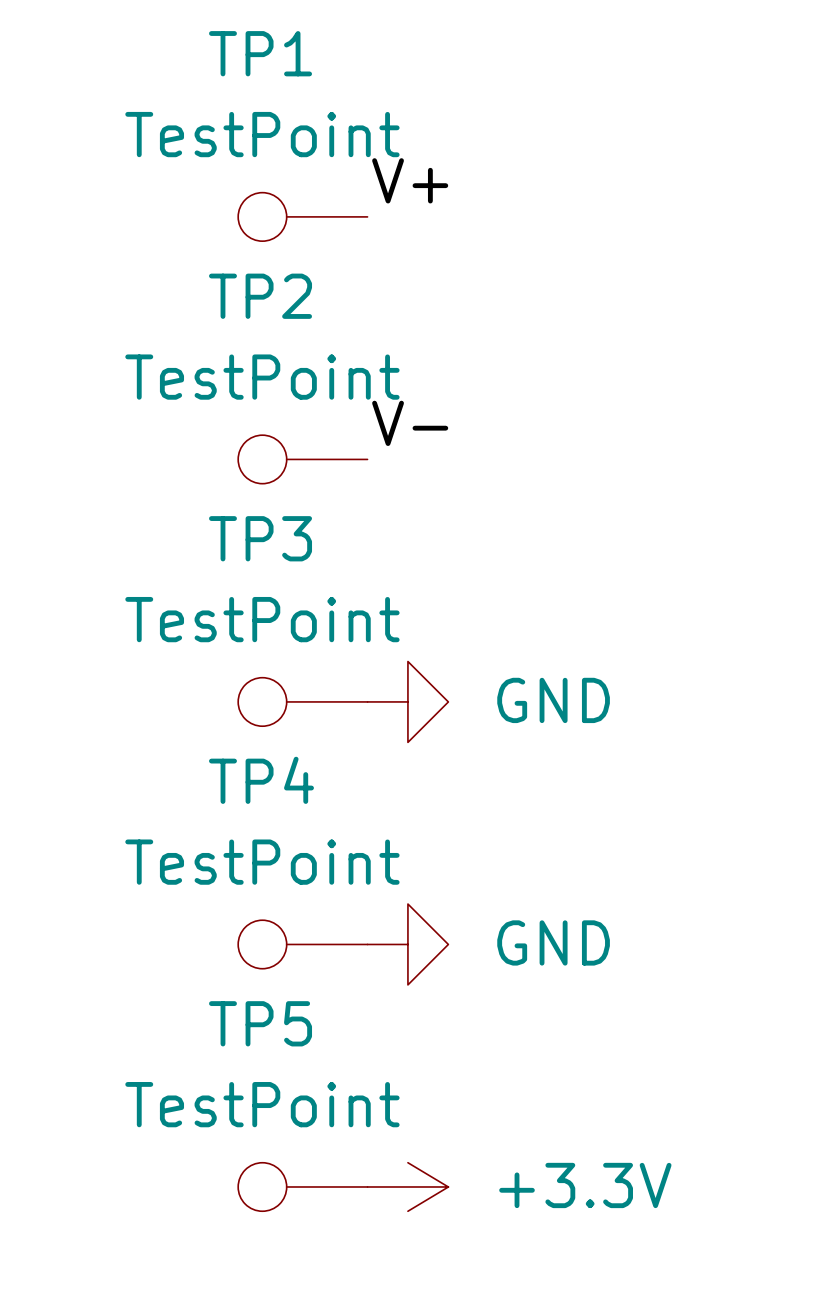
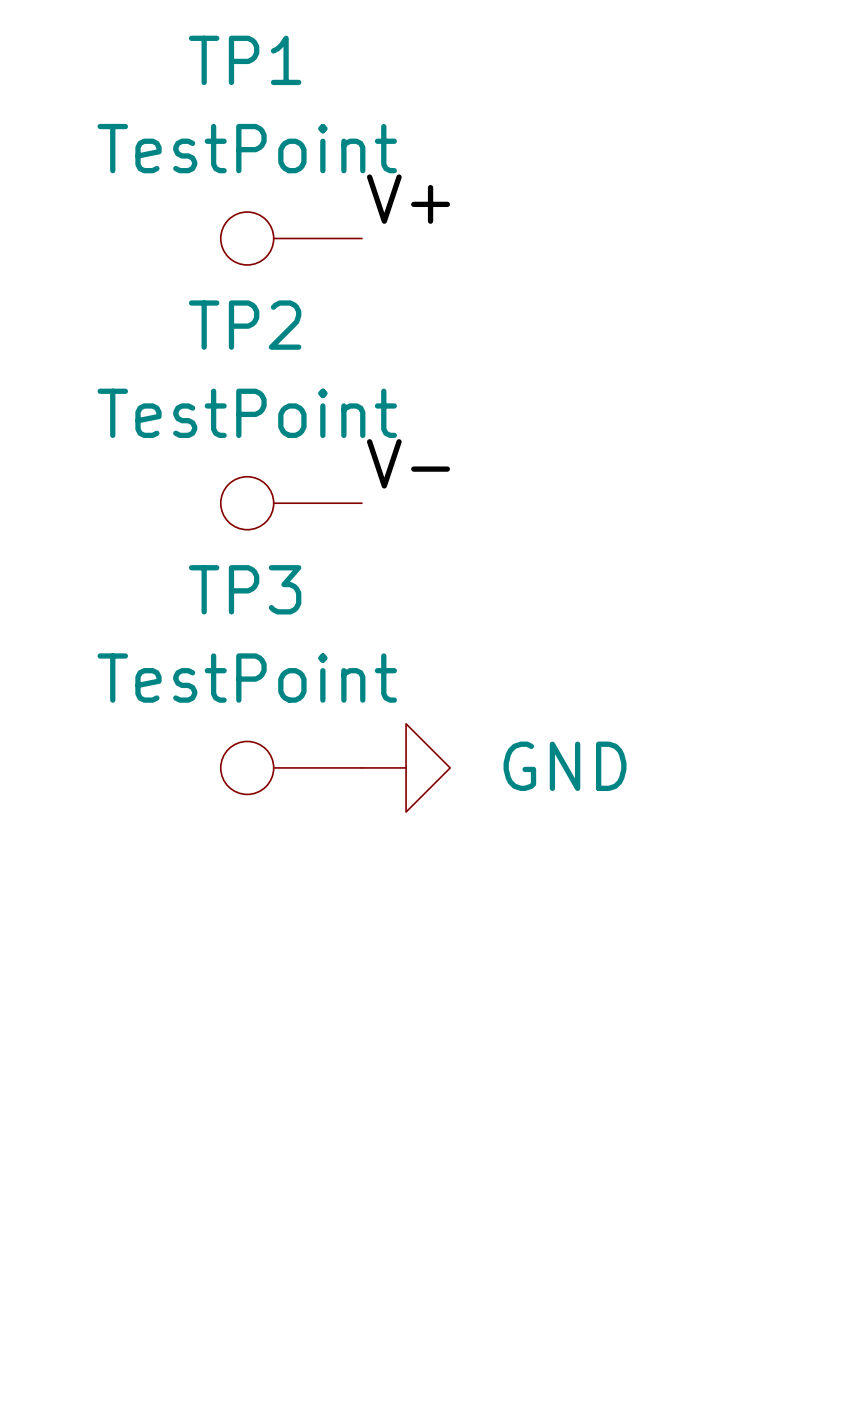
TP4: TestPoint (302, 944) -> none
power symbol: GND (407, 944) -> none
TP5: TestPoint (302, 1186) -> none
power symbol: +3.3V (407, 1186) -> none

